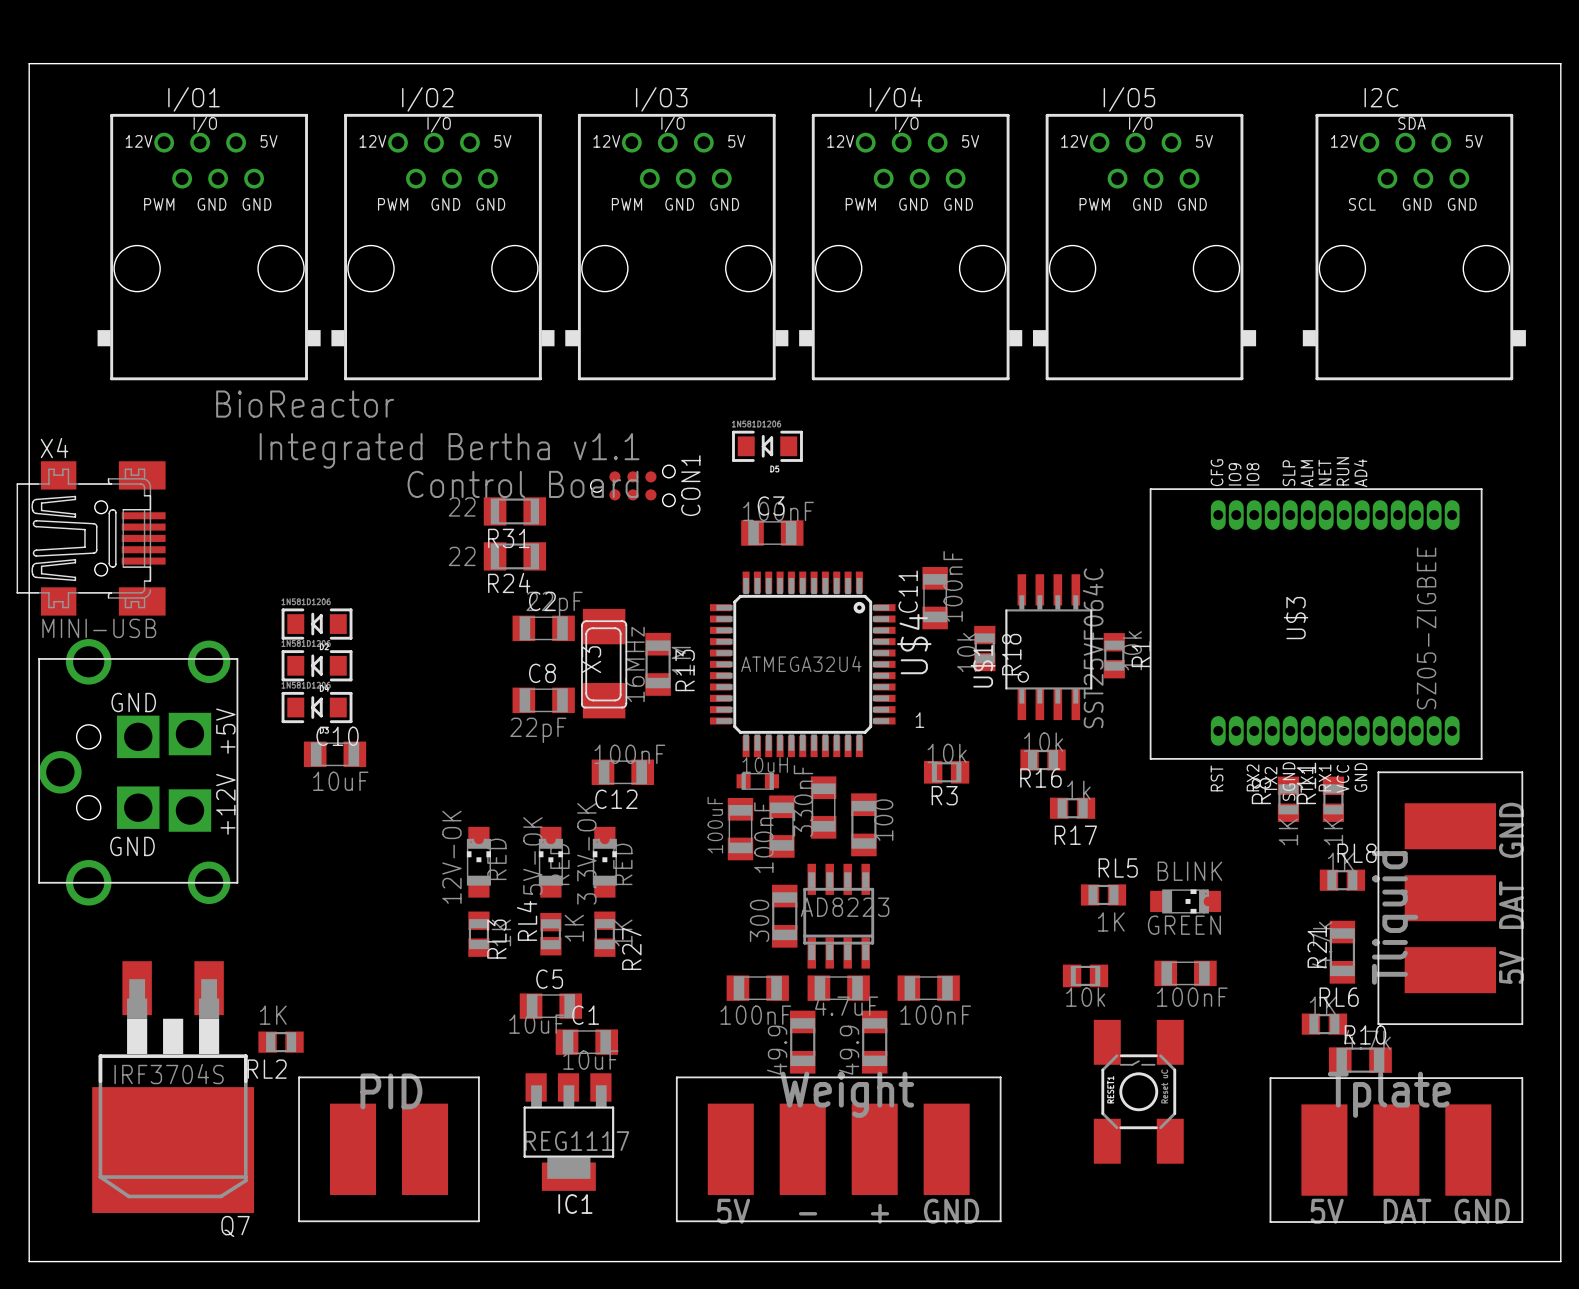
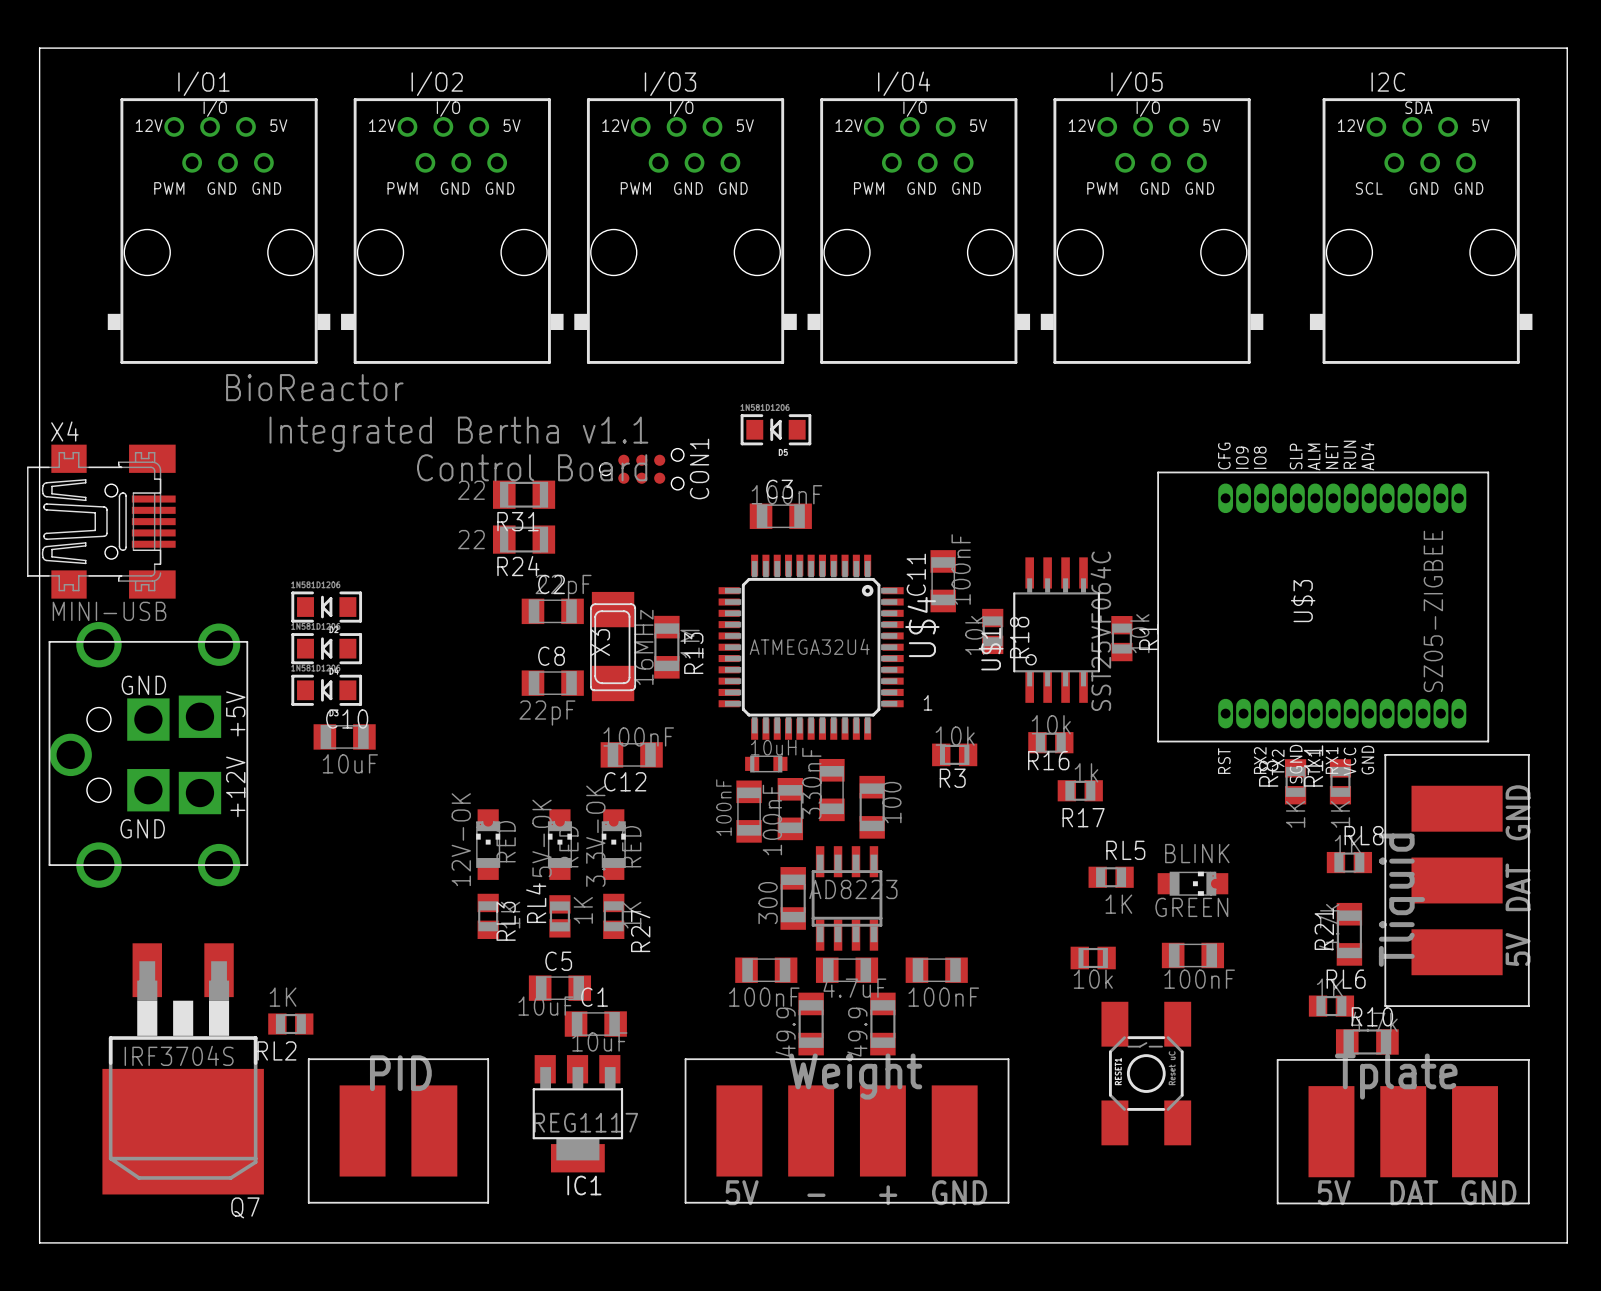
part value: 100uF (715, 825) -> 100nF (723, 807)

